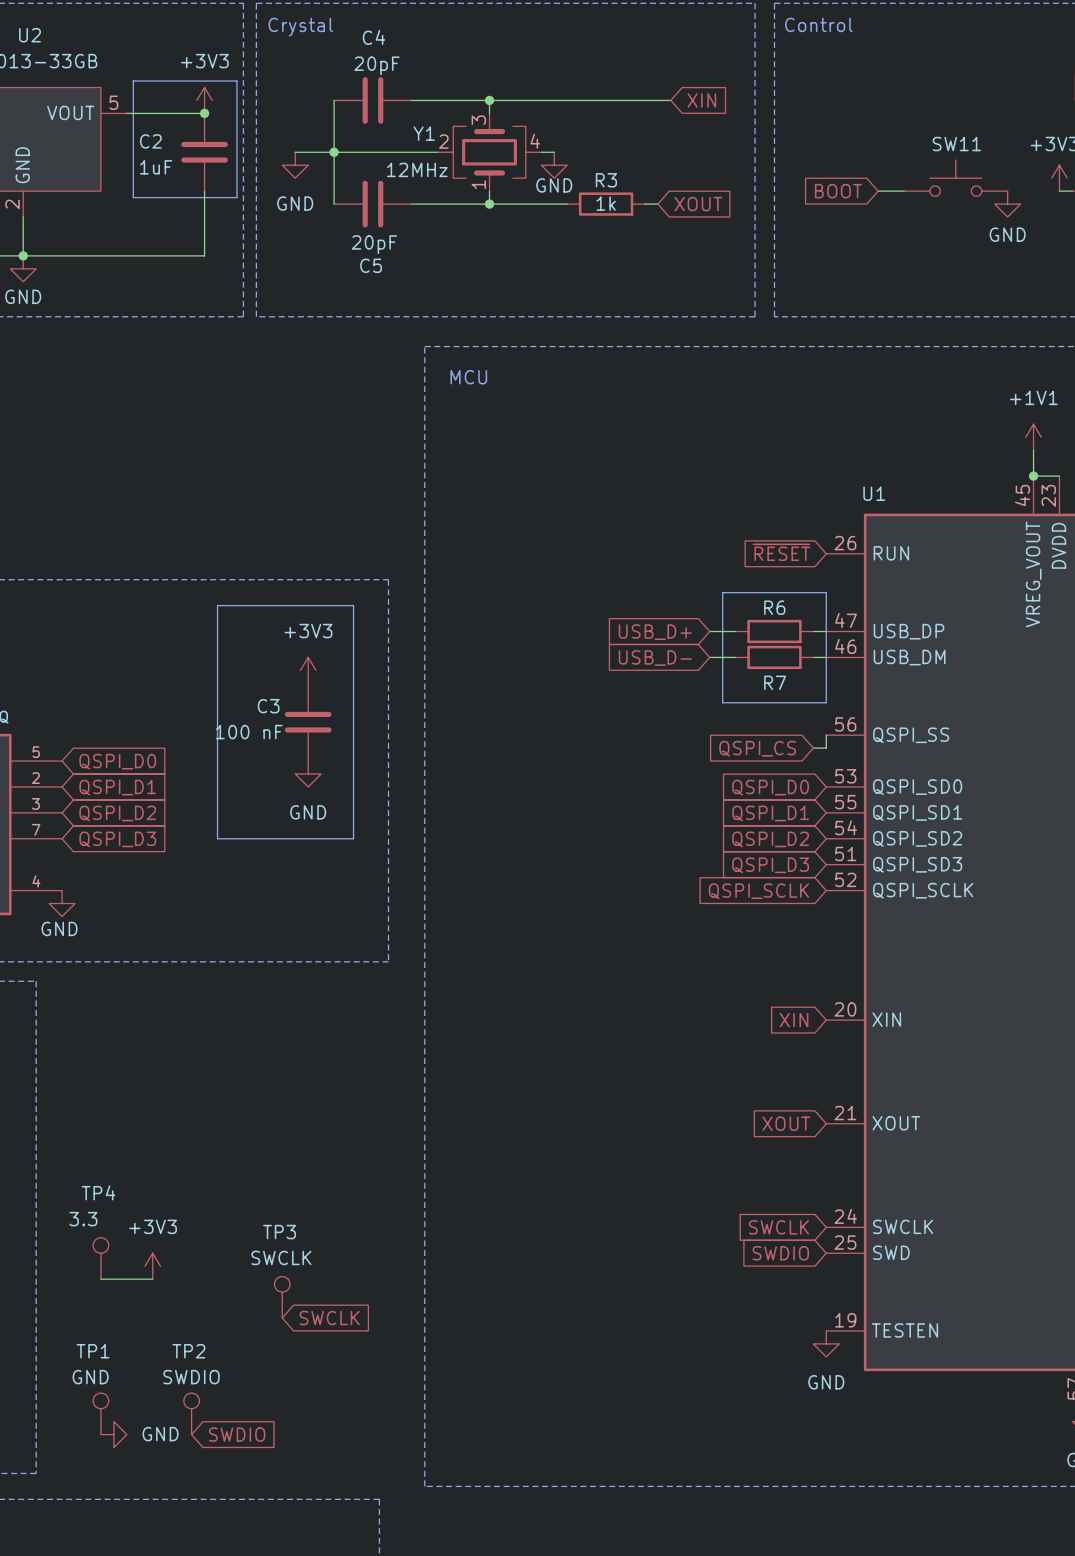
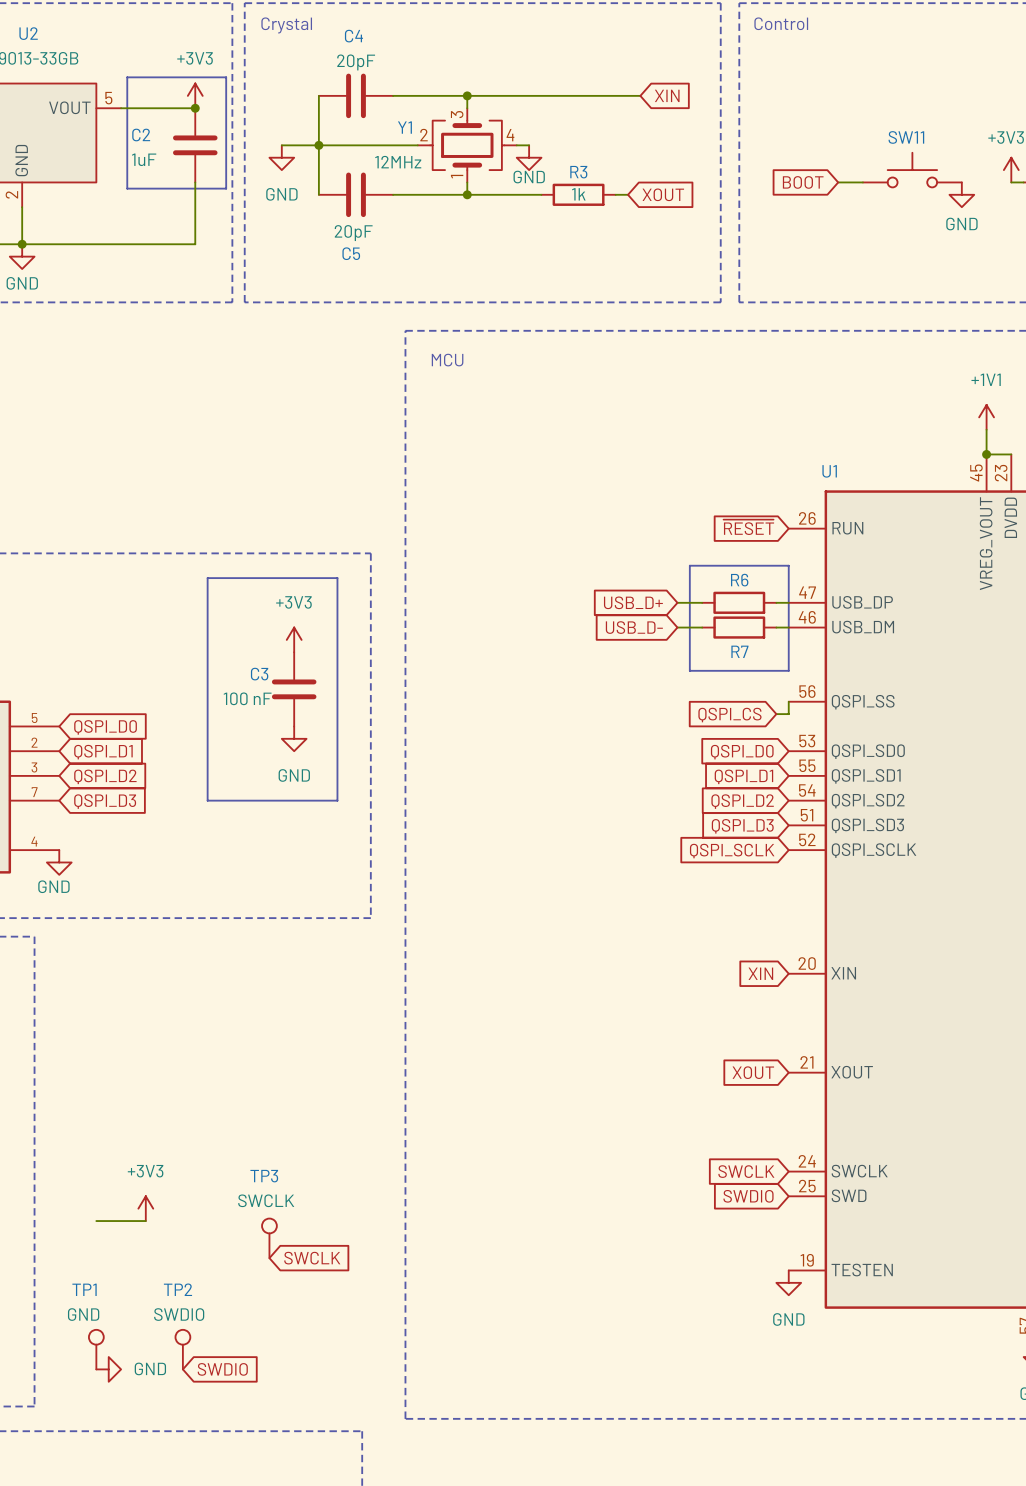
TP4: 3.3 (100, 1258) -> none

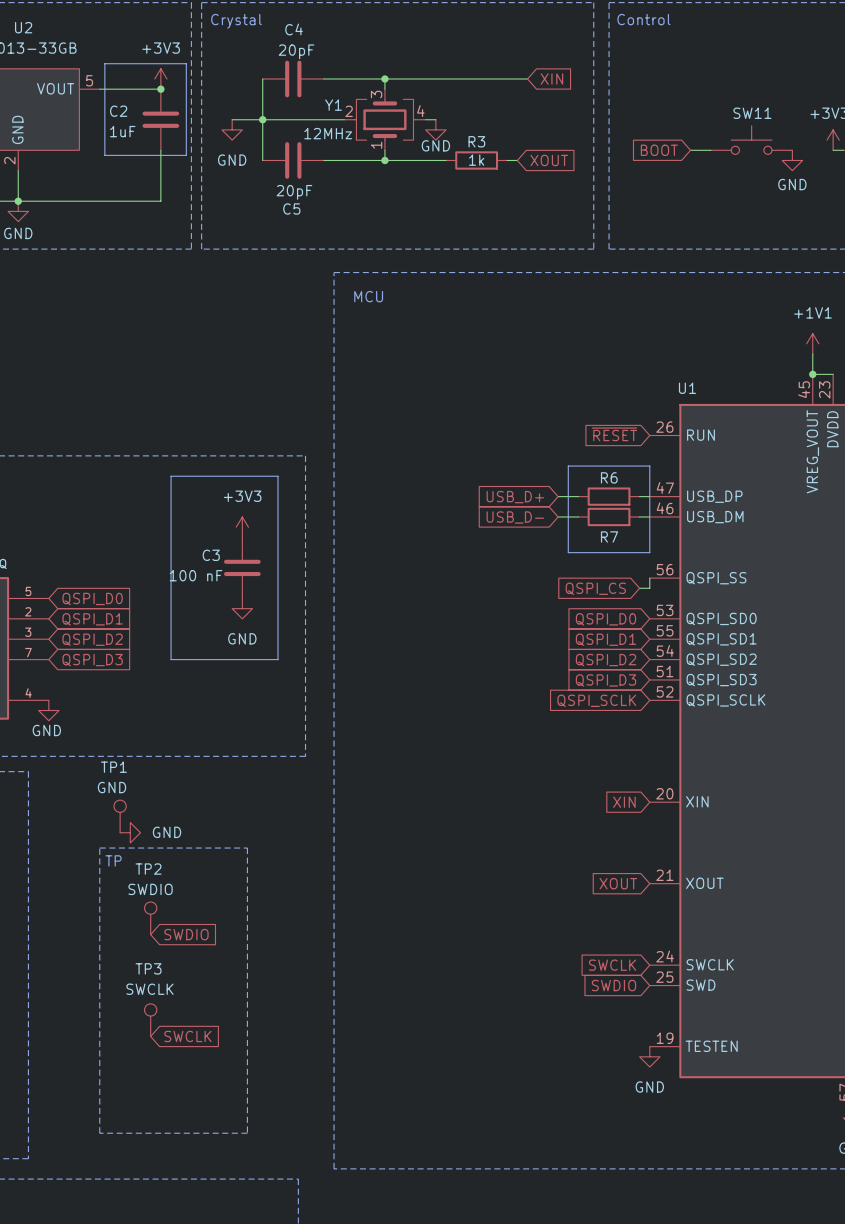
power symbol: none -> GND (130, 832)
line: none -> (99, 848) (247, 848) (247, 1133) (99, 1133) (99, 848)
text: none -> TP (113, 860)
power symbol: +3V3 (145, 1208) -> none
wire: (96, 1221) (145, 1221) -> none
TP3 position: (269, 1238) -> (150, 1020)
global label position: SWCLK (312, 1258) -> SWCLK (187, 1036)
TP1 position: (96, 1349) -> (120, 816)
TP2 position: (182, 1349) -> (150, 918)
power symbol: GND (108, 1369) -> none
global label position: SWDIO (222, 1369) -> SWDIO (186, 934)

